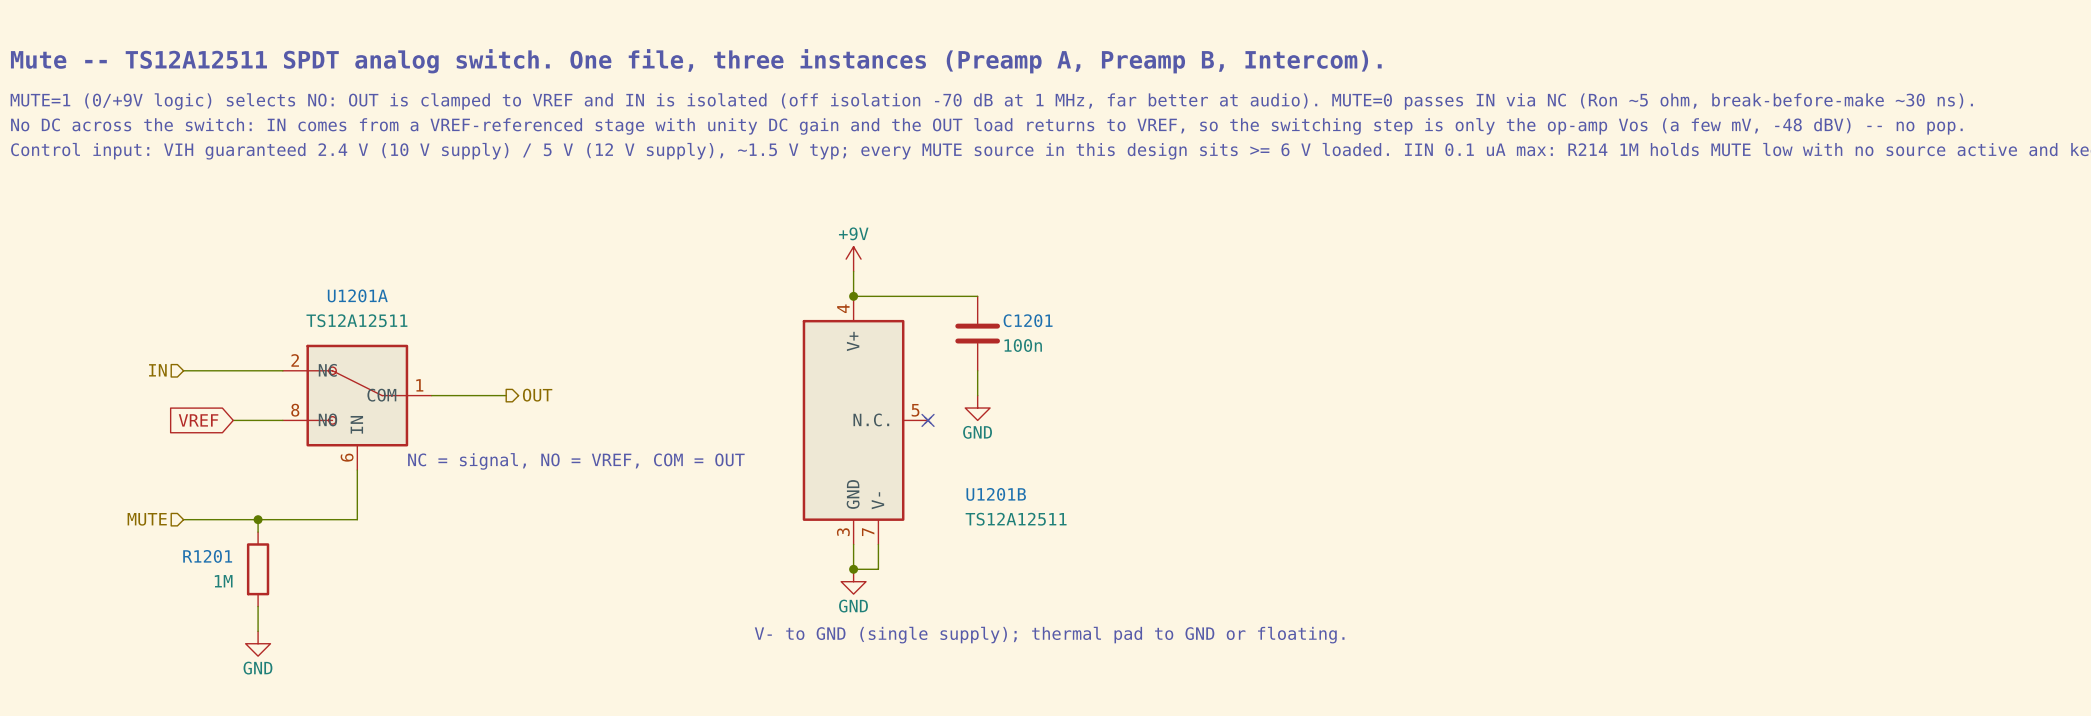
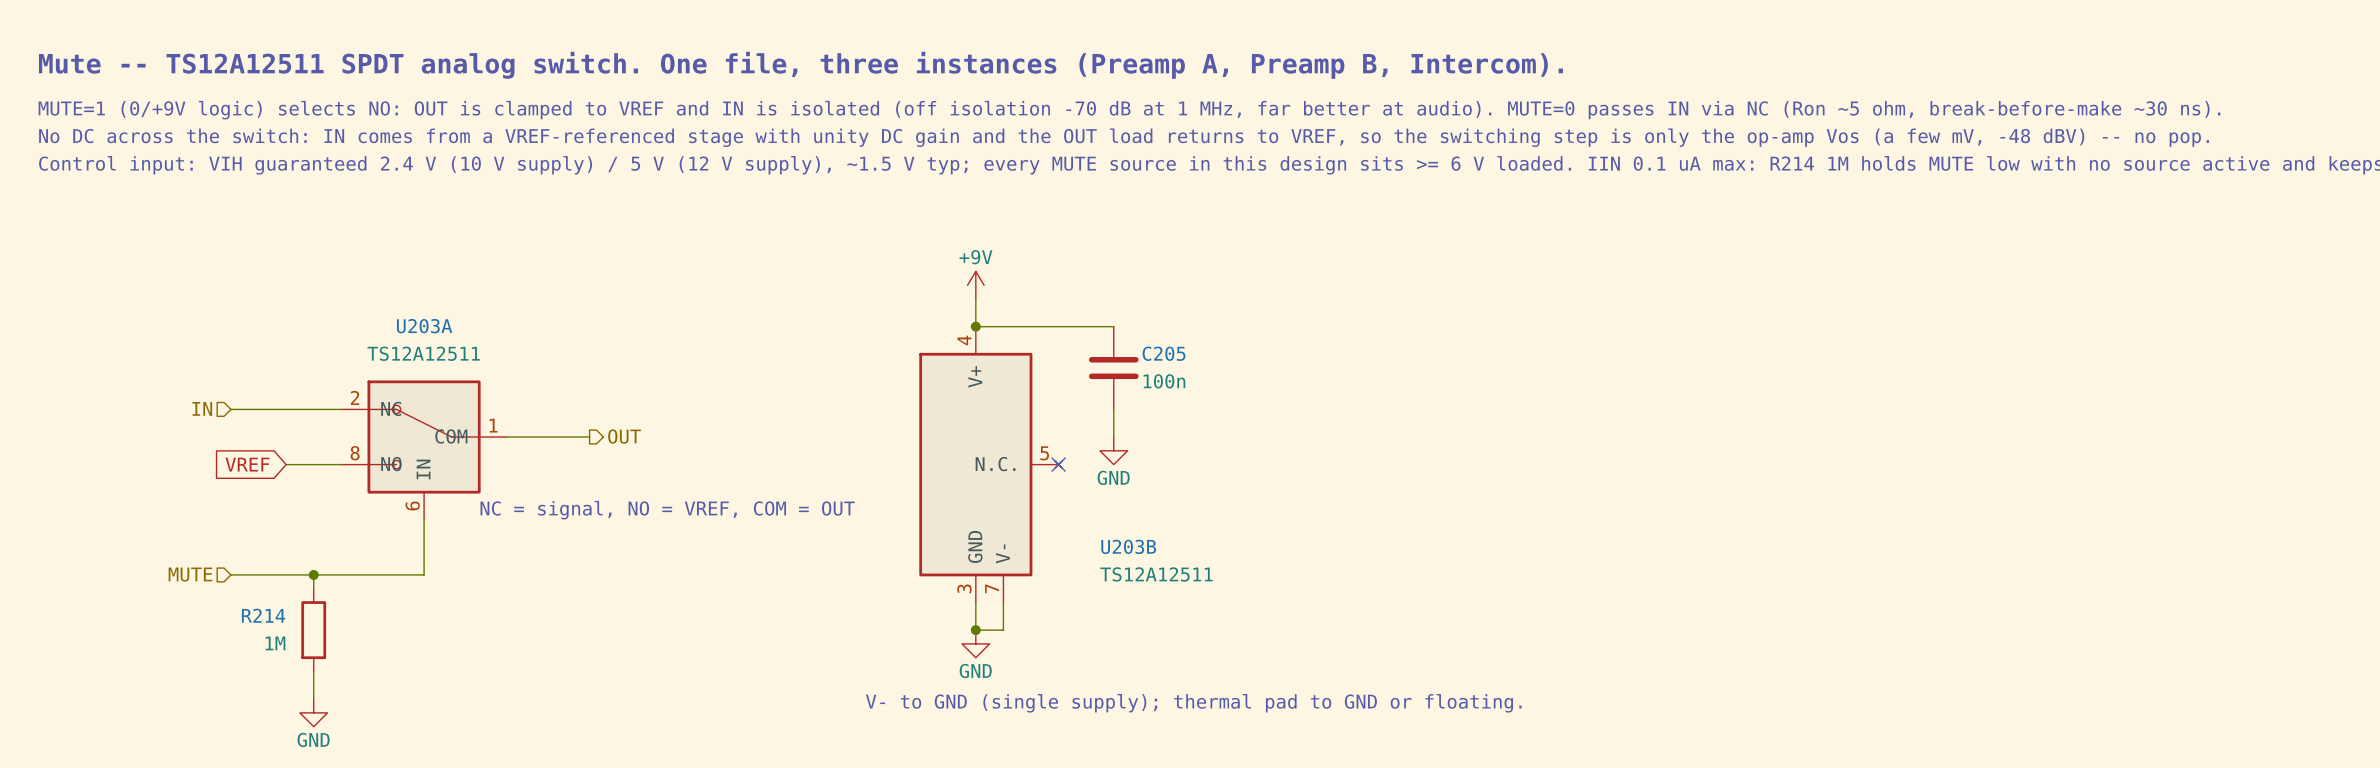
U1201A name: U1201A (357, 295) -> U203A (424, 326)
C1201 name: C1201 (1028, 320) -> C205 (1164, 353)
U1201B name: U1201B (996, 494) -> U203B (1128, 546)
R1201 name: R1201 (207, 556) -> R214 (263, 615)

